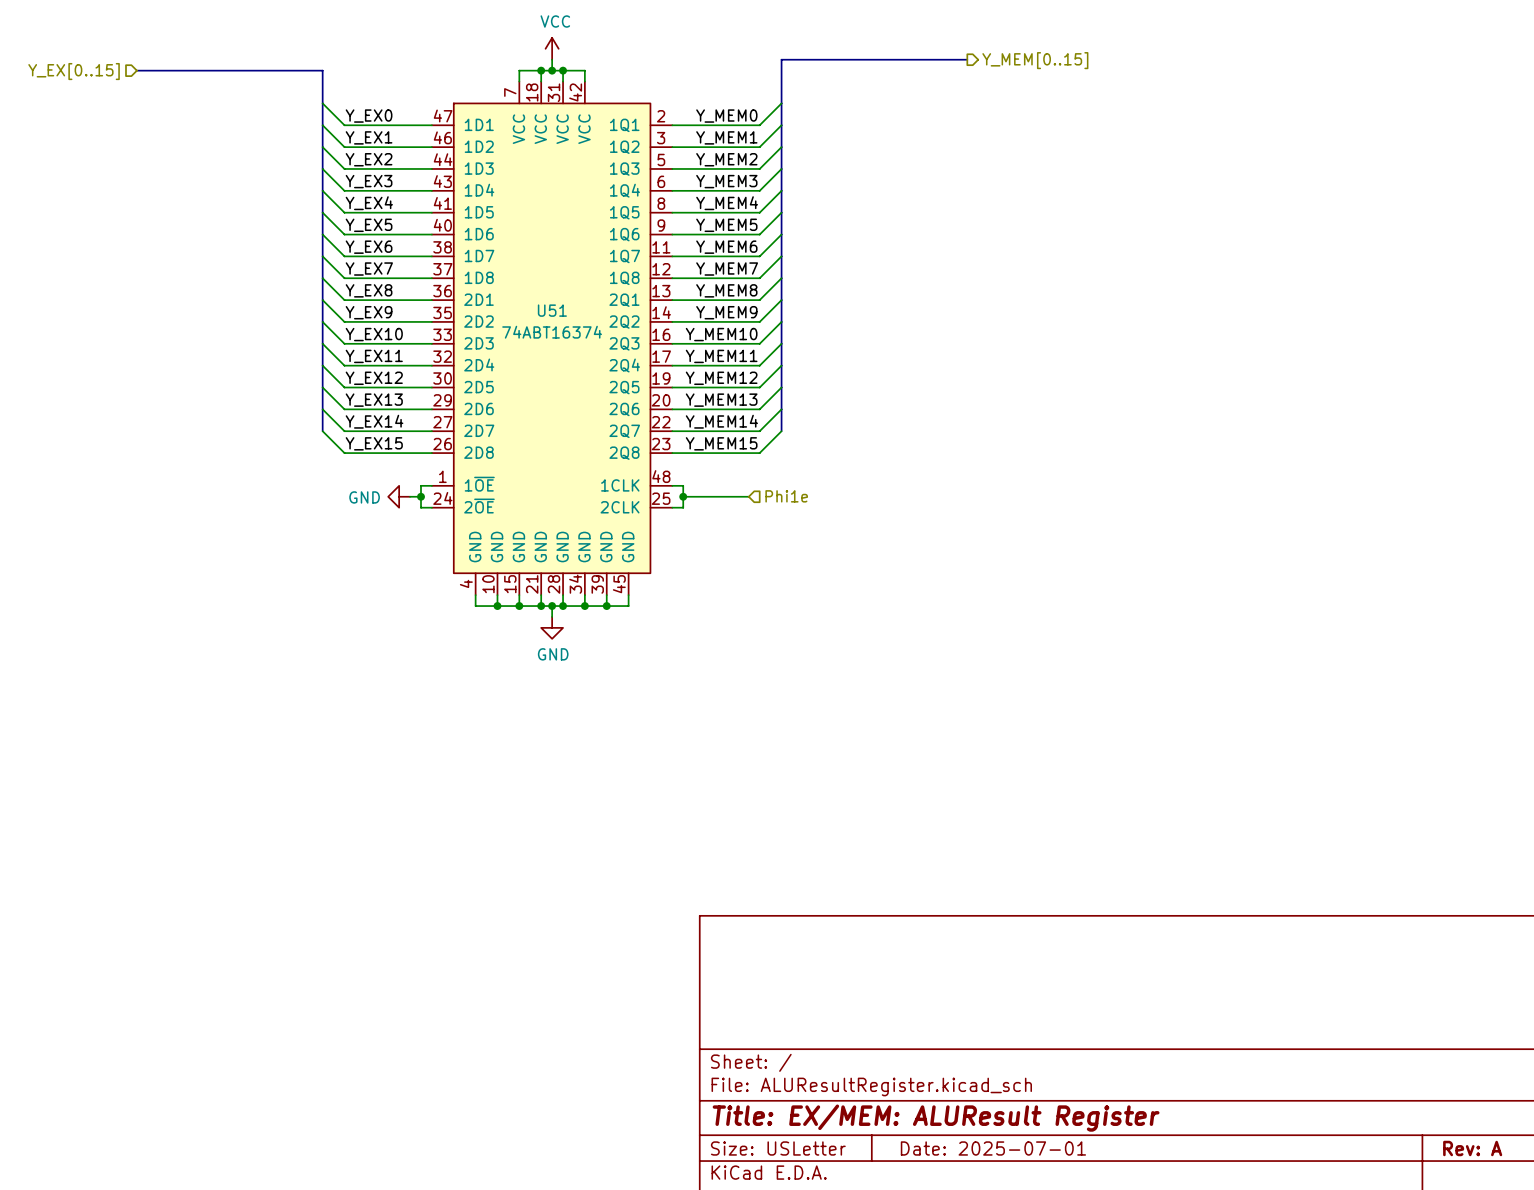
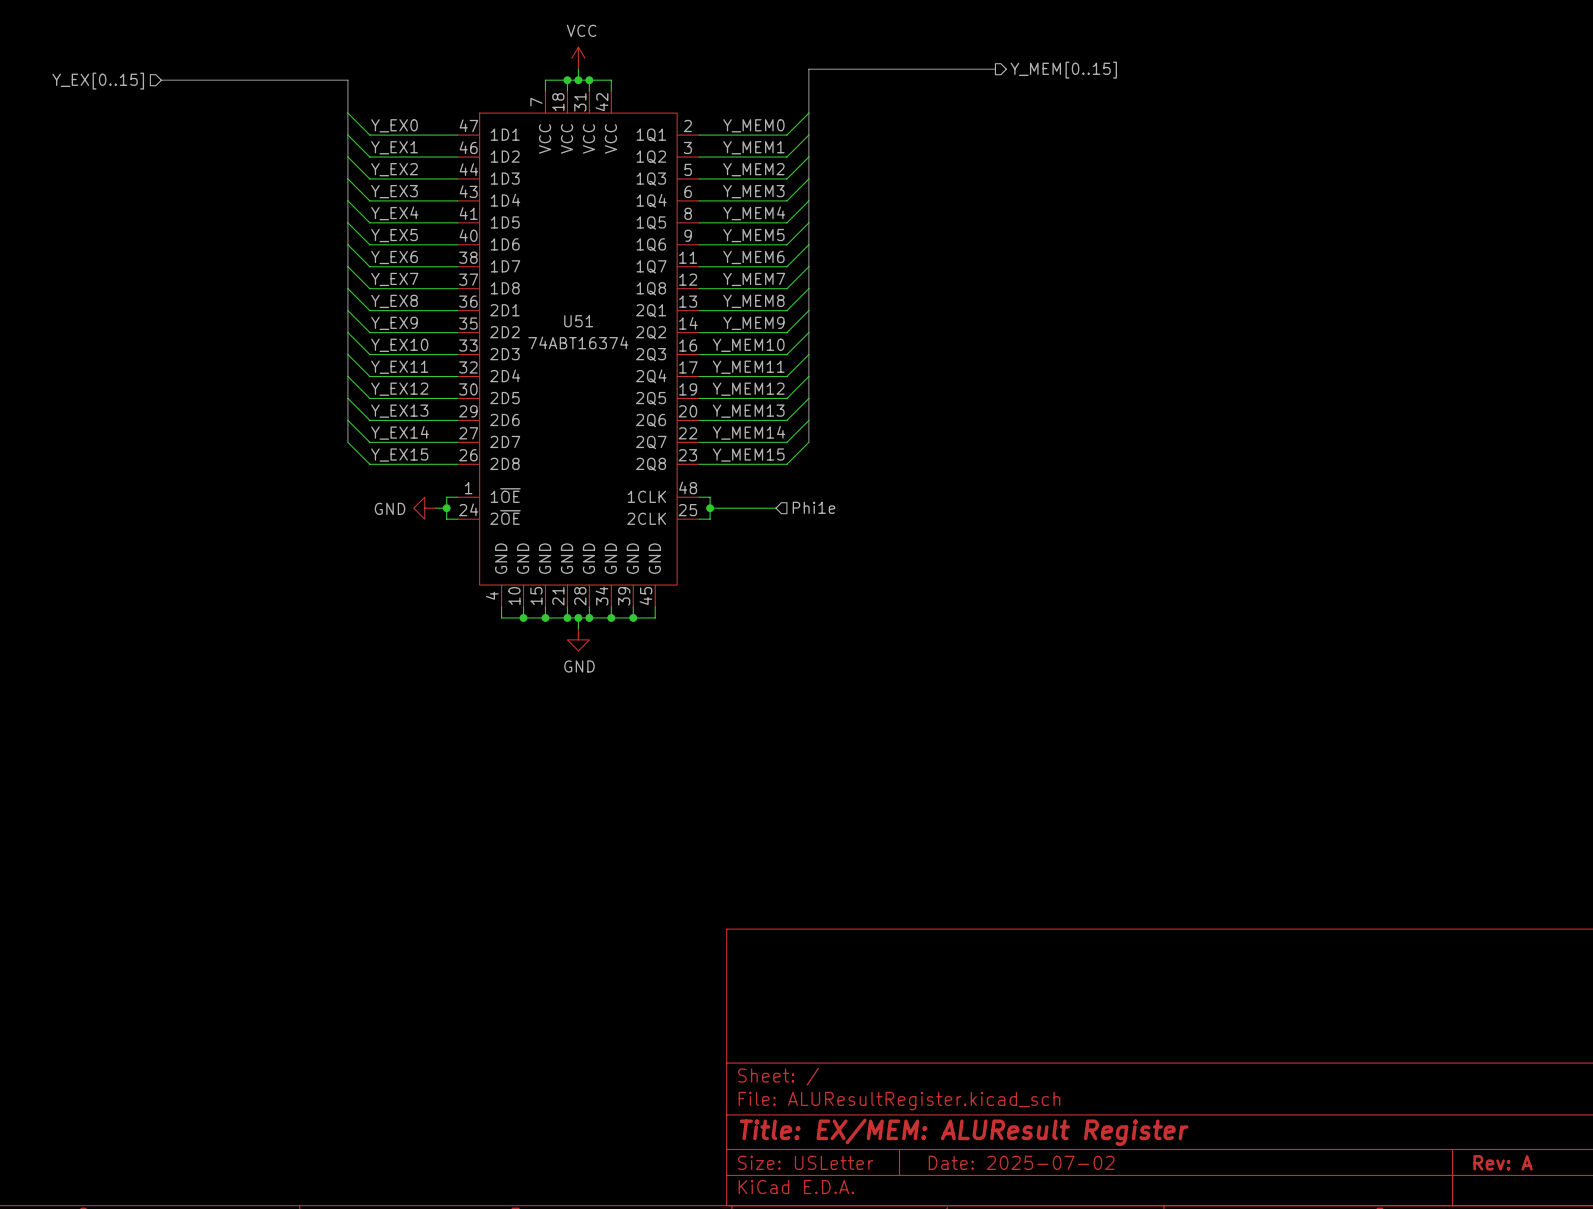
title block: Date: 2025-07-01 (993, 1148) -> Date: 2025-07-02 (1021, 1162)

